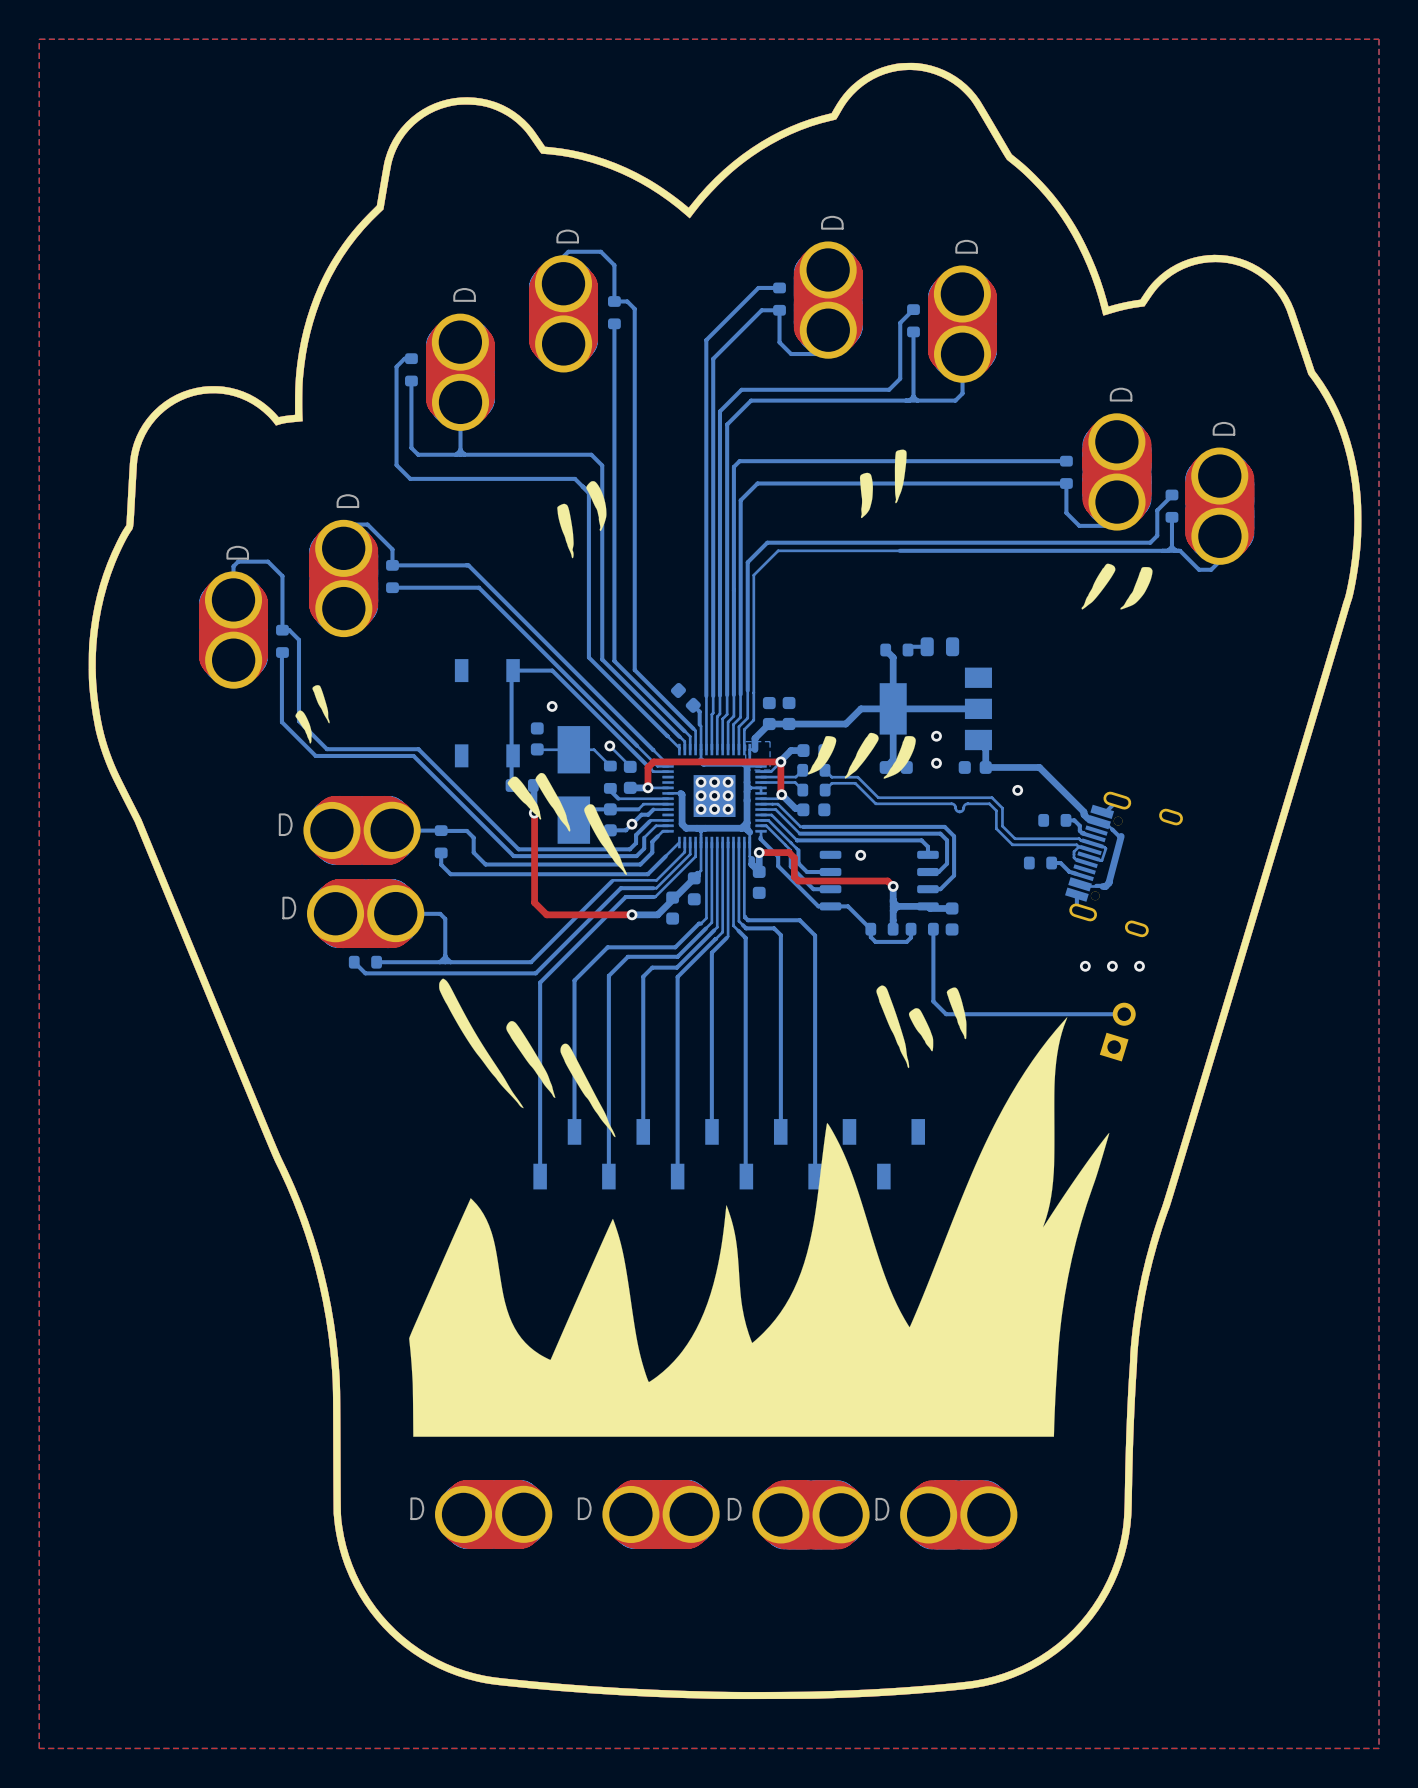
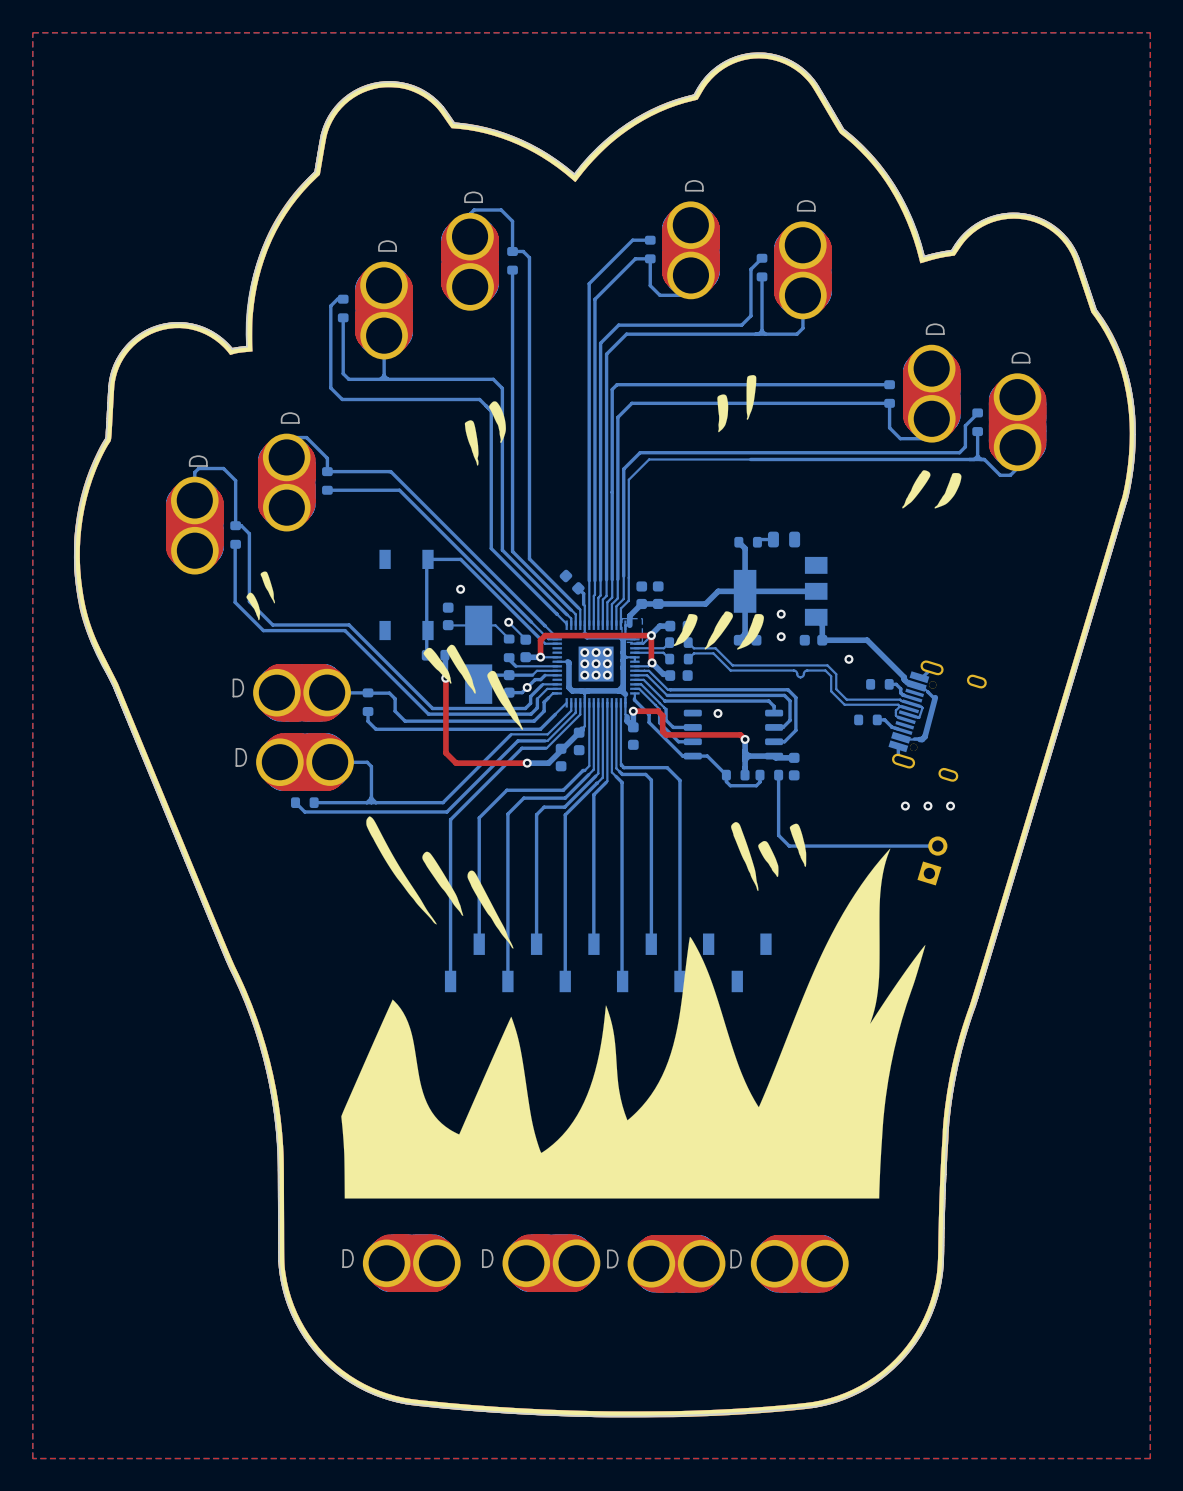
board edge: none -> (821, 92) (843, 129) (871, 155) (894, 185) (912, 219) (924, 256) (951, 250) (959, 238) (975, 224) (1002, 214) (1031, 215) (1051, 224) (1062, 233) (1075, 251) (1096, 310) (1108, 328) (1122, 358) (1128, 379) (1134, 412) (1133, 457) (1126, 501) (957, 1067) (946, 1138) (942, 1273) (934, 1305) (926, 1325) (914, 1343) (900, 1360) (884, 1375) (866, 1387) (847, 1397) (815, 1406) (679, 1415) (576, 1415) (474, 1410) (405, 1403) (386, 1398) (357, 1386) (332, 1368) (305, 1338) (290, 1310) (283, 1291) (279, 1261) (278, 1169) (274, 1115) (260, 1044) (242, 993) (220, 946) (114, 688) (91, 643) (83, 619) (76, 582) (75, 532) (85, 483) (106, 438) (111, 372) (120, 354) (133, 338) (151, 328) (164, 324) (178, 322) (198, 325) (217, 334) (232, 348) (247, 346) (249, 298) (257, 263) (266, 240) (291, 198) (315, 171) (321, 134) (329, 115) (343, 99) (366, 85) (387, 82) (414, 86) (437, 101) (454, 123) (486, 128) (518, 139) (547, 154) (574, 174) (590, 155) (617, 131) (659, 106) (694, 95) (711, 71) (736, 57) (764, 53) (785, 58) (804, 70) (821, 92)

